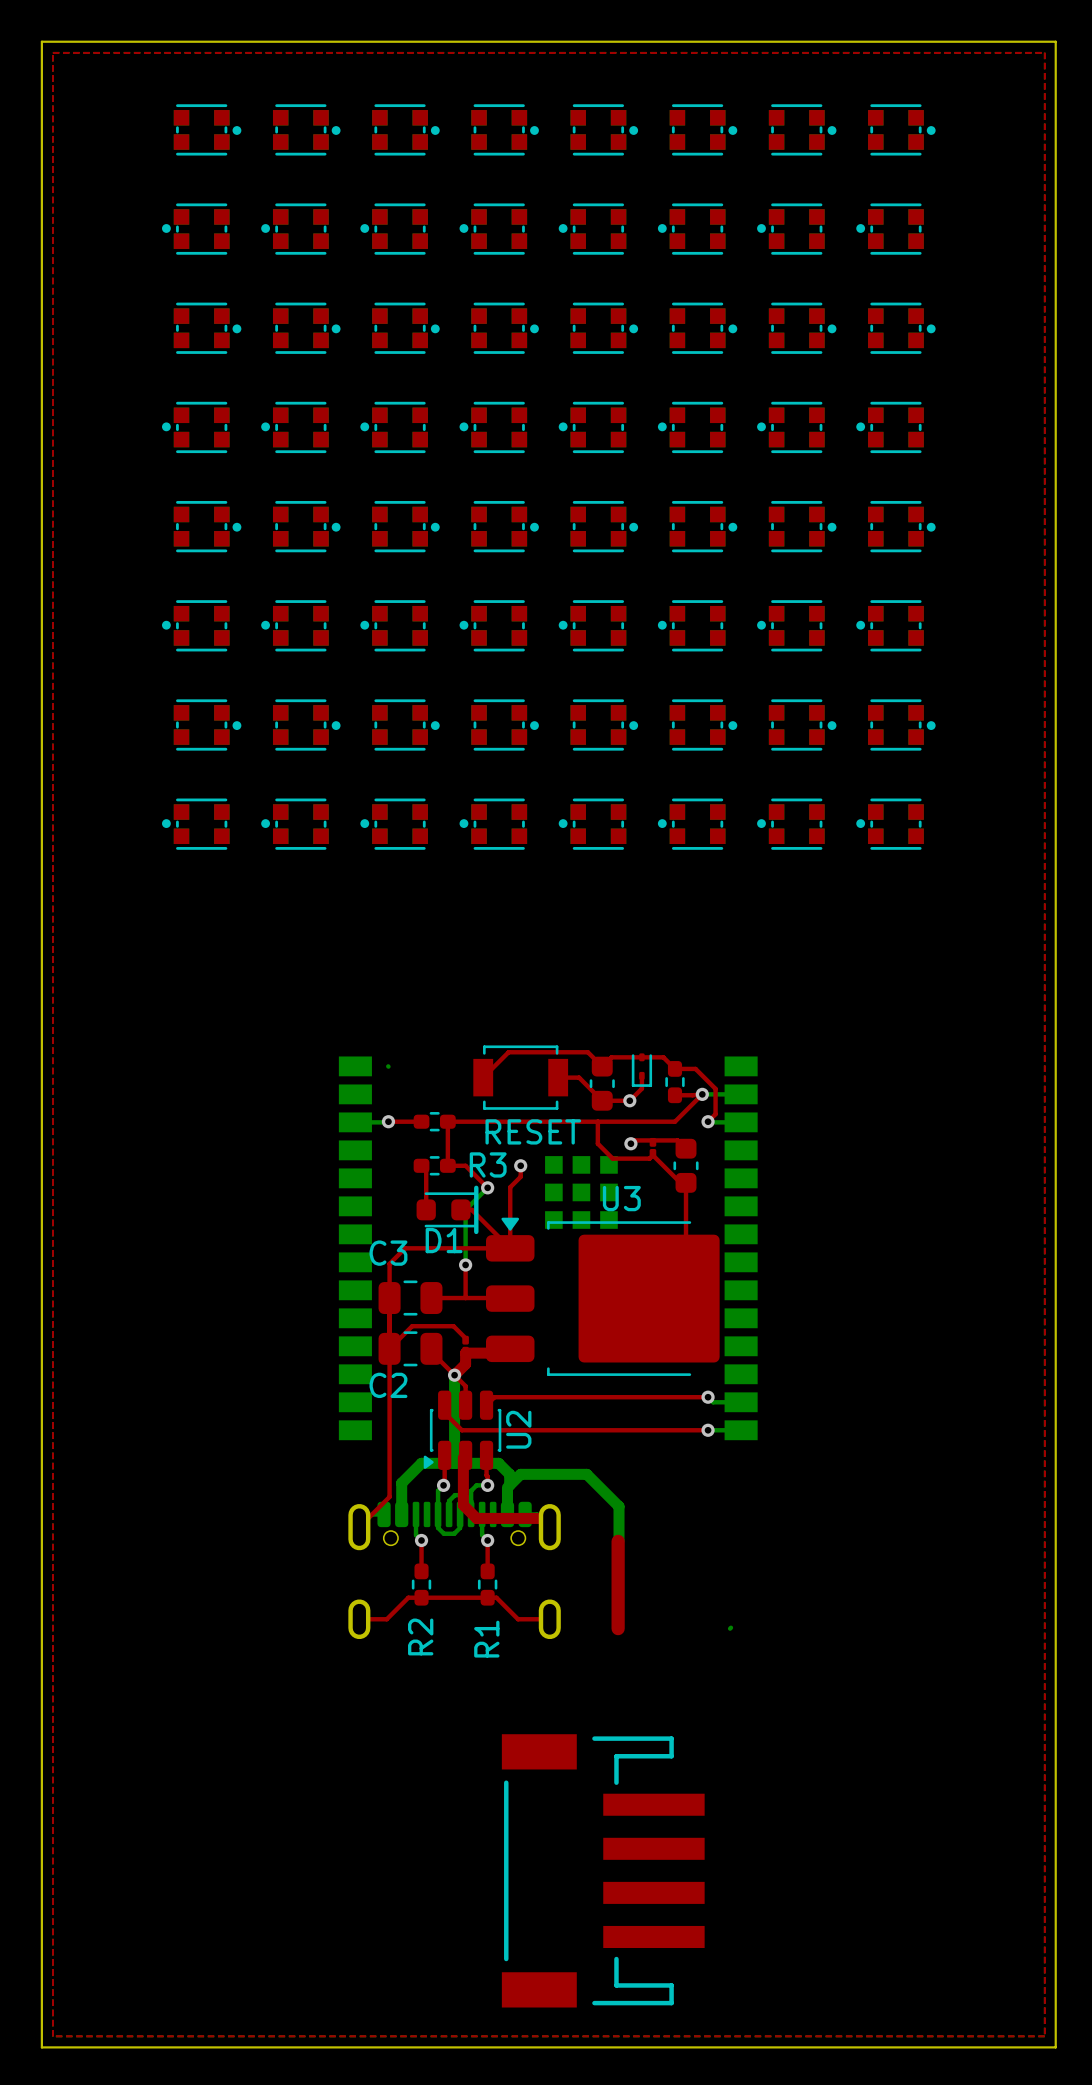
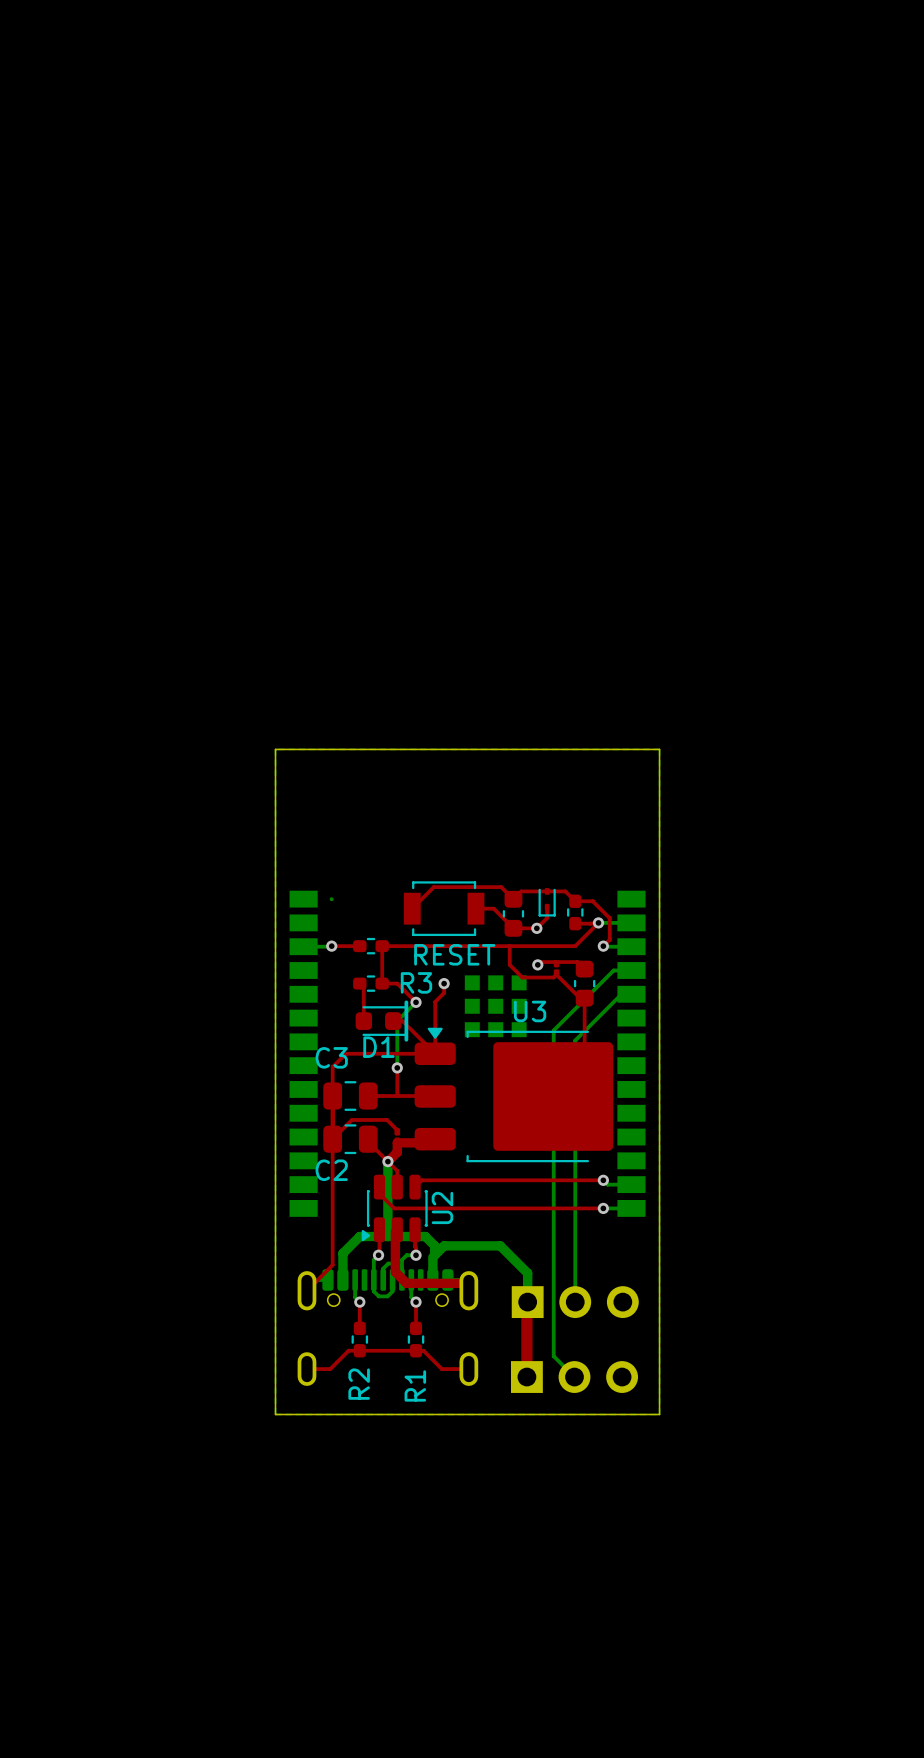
board edge: (41, 41) (1055, 41) (1055, 2047) (41, 2047) (41, 41) -> none
top zone outline: (52, 52) (1044, 52) (1044, 2036) (52, 2036) (52, 52) -> none
part: (207, 129) -> none
part: (306, 129) -> none
part: (405, 129) -> none
part: (505, 129) -> none
part: (604, 129) -> none
part: (703, 129) -> none
part: (802, 129) -> none
part: (901, 129) -> none
part: (195, 229) -> none
part: (294, 229) -> none
part: (394, 229) -> none
part: (493, 229) -> none
part: (592, 229) -> none
part: (691, 229) -> none
part: (790, 229) -> none
part: (890, 229) -> none
part: (207, 328) -> none
part: (306, 328) -> none
part: (405, 328) -> none
part: (505, 328) -> none
part: (604, 328) -> none
part: (703, 328) -> none
part: (802, 328) -> none
part: (901, 328) -> none
part: (195, 427) -> none
part: (294, 427) -> none
part: (394, 427) -> none
part: (493, 427) -> none
part: (592, 427) -> none
part: (691, 427) -> none
part: (790, 427) -> none
part: (890, 427) -> none
part: (207, 526) -> none
part: (306, 526) -> none
part: (405, 526) -> none
part: (505, 526) -> none
part: (604, 526) -> none
part: (703, 526) -> none
part: (802, 526) -> none
part: (901, 526) -> none
part: (195, 625) -> none
part: (294, 625) -> none
part: (394, 625) -> none
part: (493, 625) -> none
part: (592, 625) -> none
part: (691, 625) -> none
part: (790, 625) -> none
part: (890, 625) -> none
part: (207, 724) -> none
part: (306, 724) -> none
part: (405, 724) -> none
part: (505, 724) -> none
part: (604, 724) -> none
part: (703, 724) -> none
part: (802, 724) -> none
part: (901, 724) -> none
part: (195, 824) -> none
part: (294, 824) -> none
part: (394, 824) -> none
part: (493, 824) -> none
part: (592, 824) -> none
part: (691, 824) -> none
part: (790, 824) -> none
part: (890, 824) -> none
board edge: none -> (275, 749) (659, 749) (659, 1414) (275, 1414) (275, 749)
bottom track: none -> (631, 970) (613, 970) (553, 1030) (553, 1356) (574, 1377)
bottom track: none -> (631, 994) (621, 994) (575, 1040) (575, 1302)
part: none -> (575, 1302)
part: none -> (574, 1377)
part: (603, 1870) -> none

